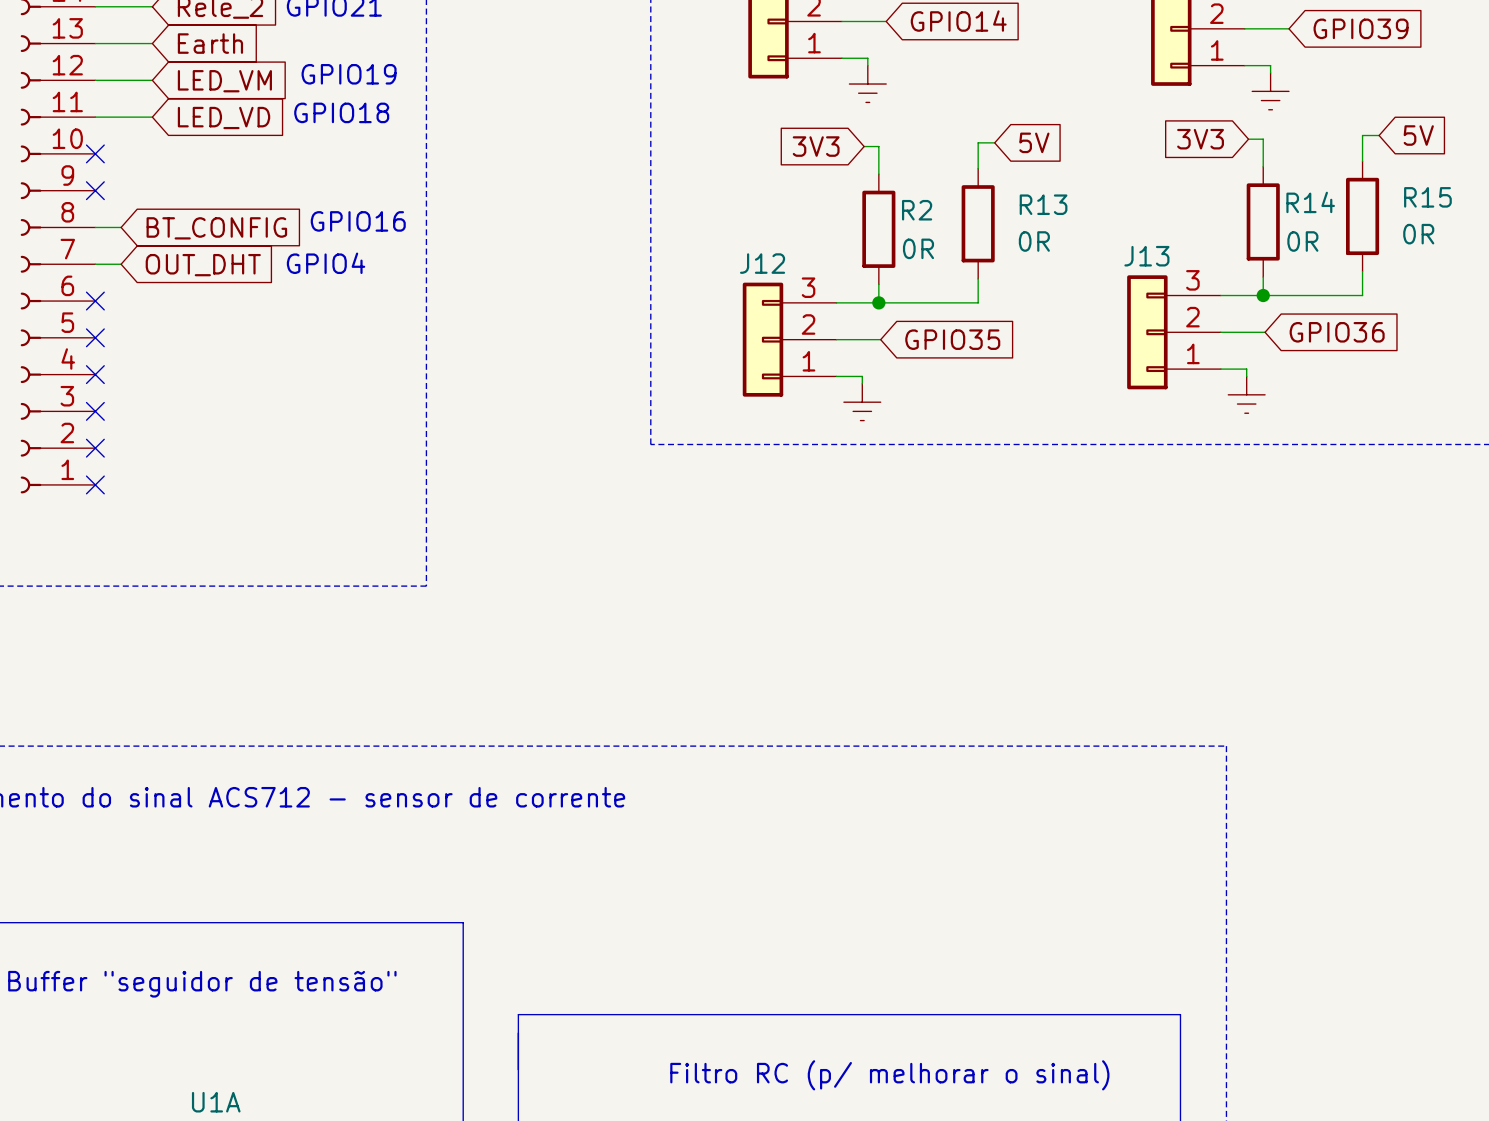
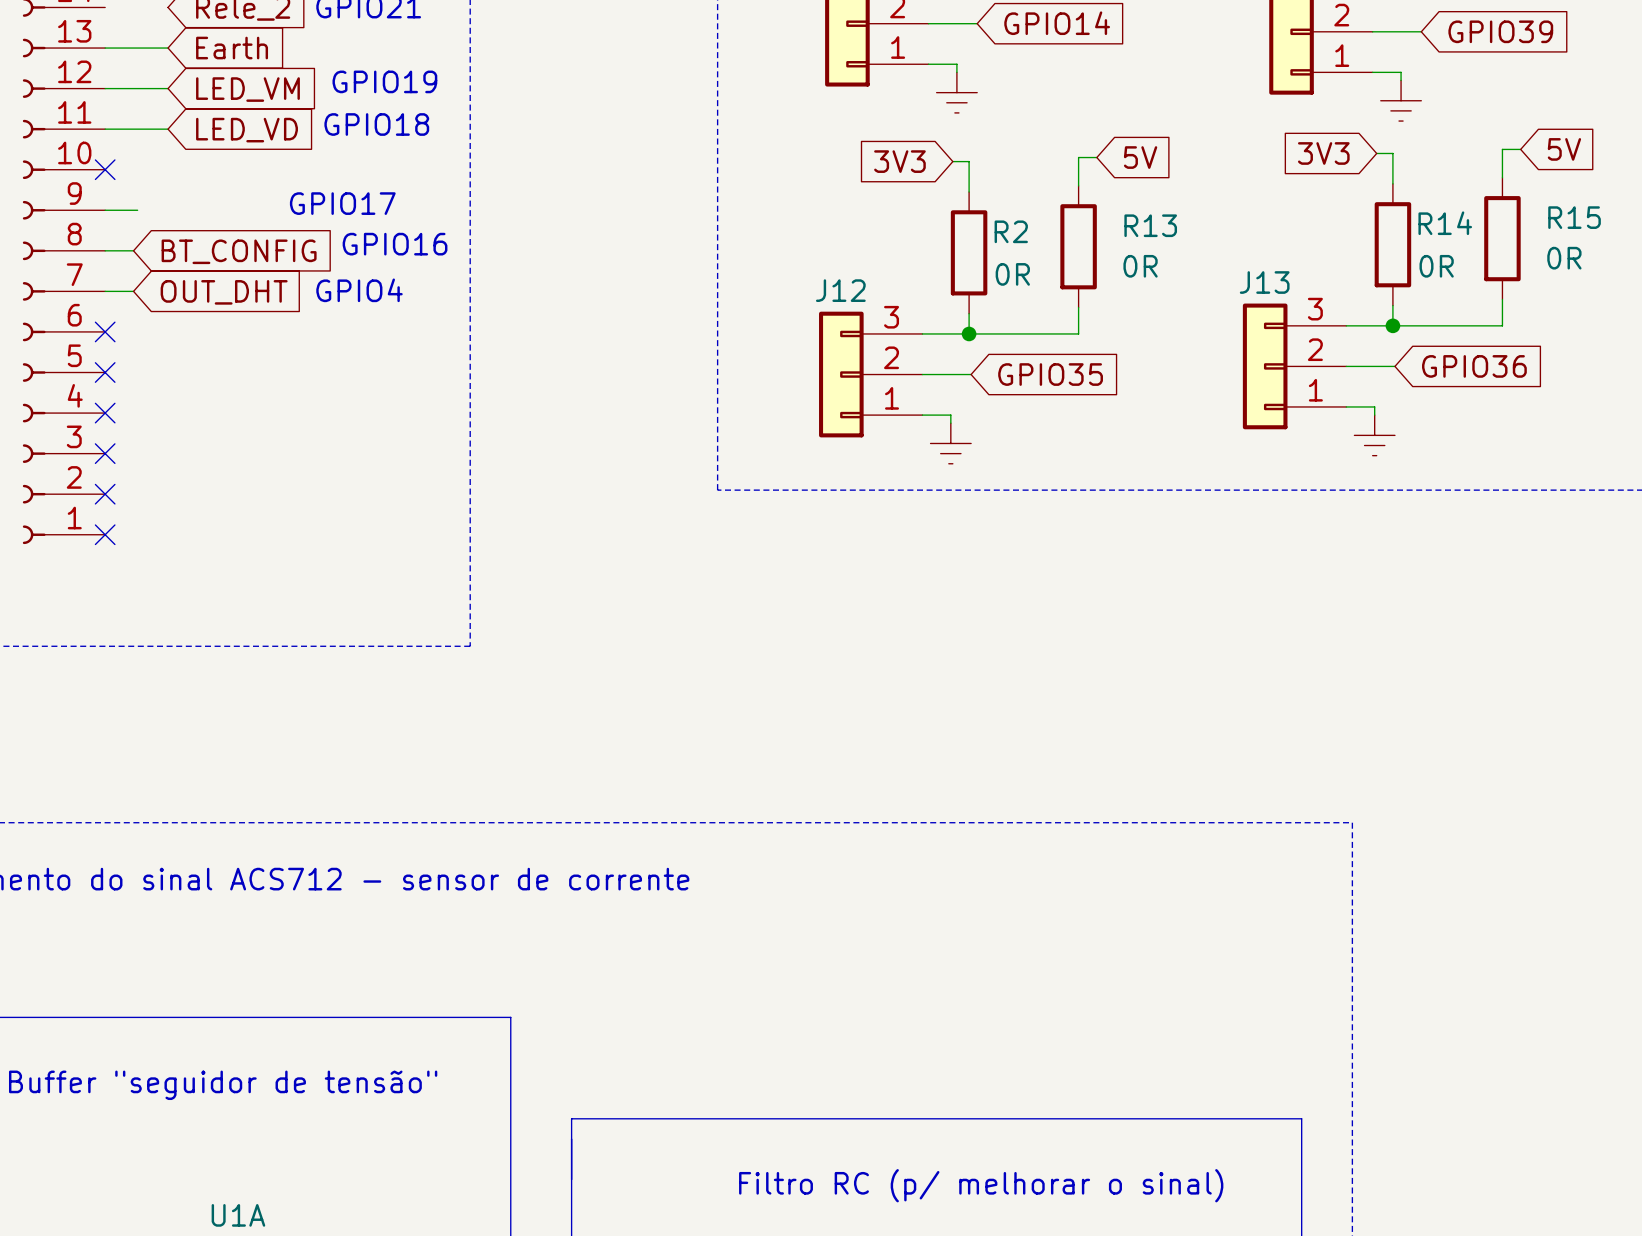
wire: (95, 6) (152, 6) -> none
text: none -> GPIO17 (342, 203)
wire: none -> (105, 210) (137, 210)
no-connect mark: (95, 190) -> none

